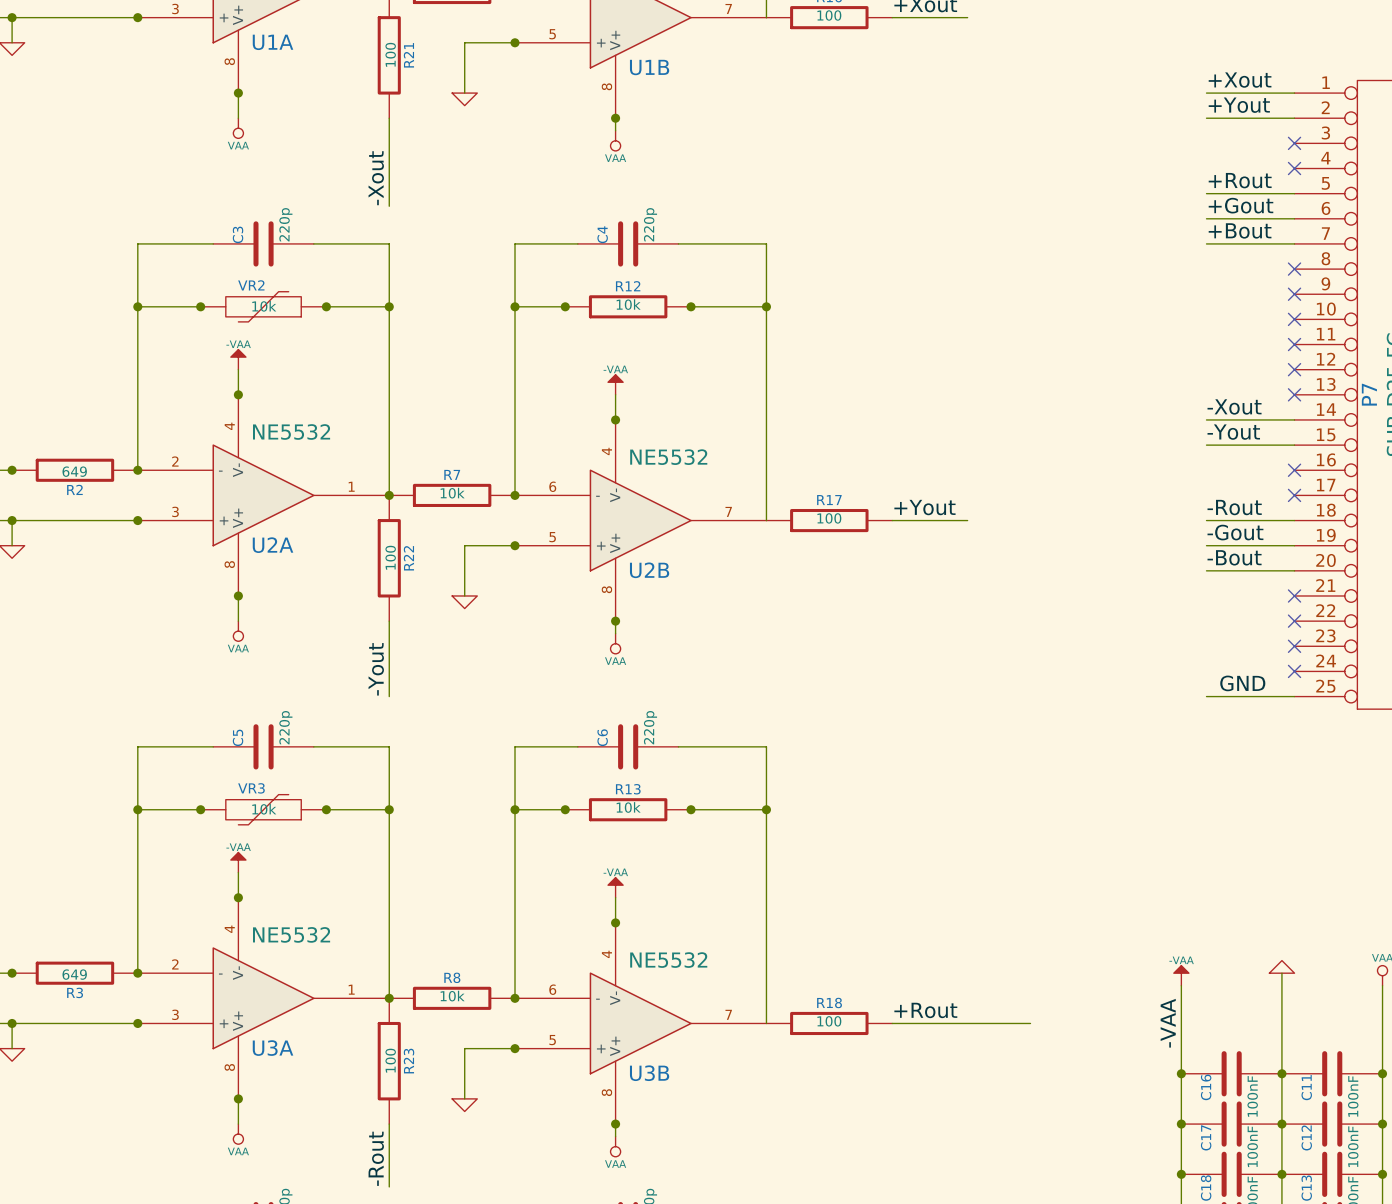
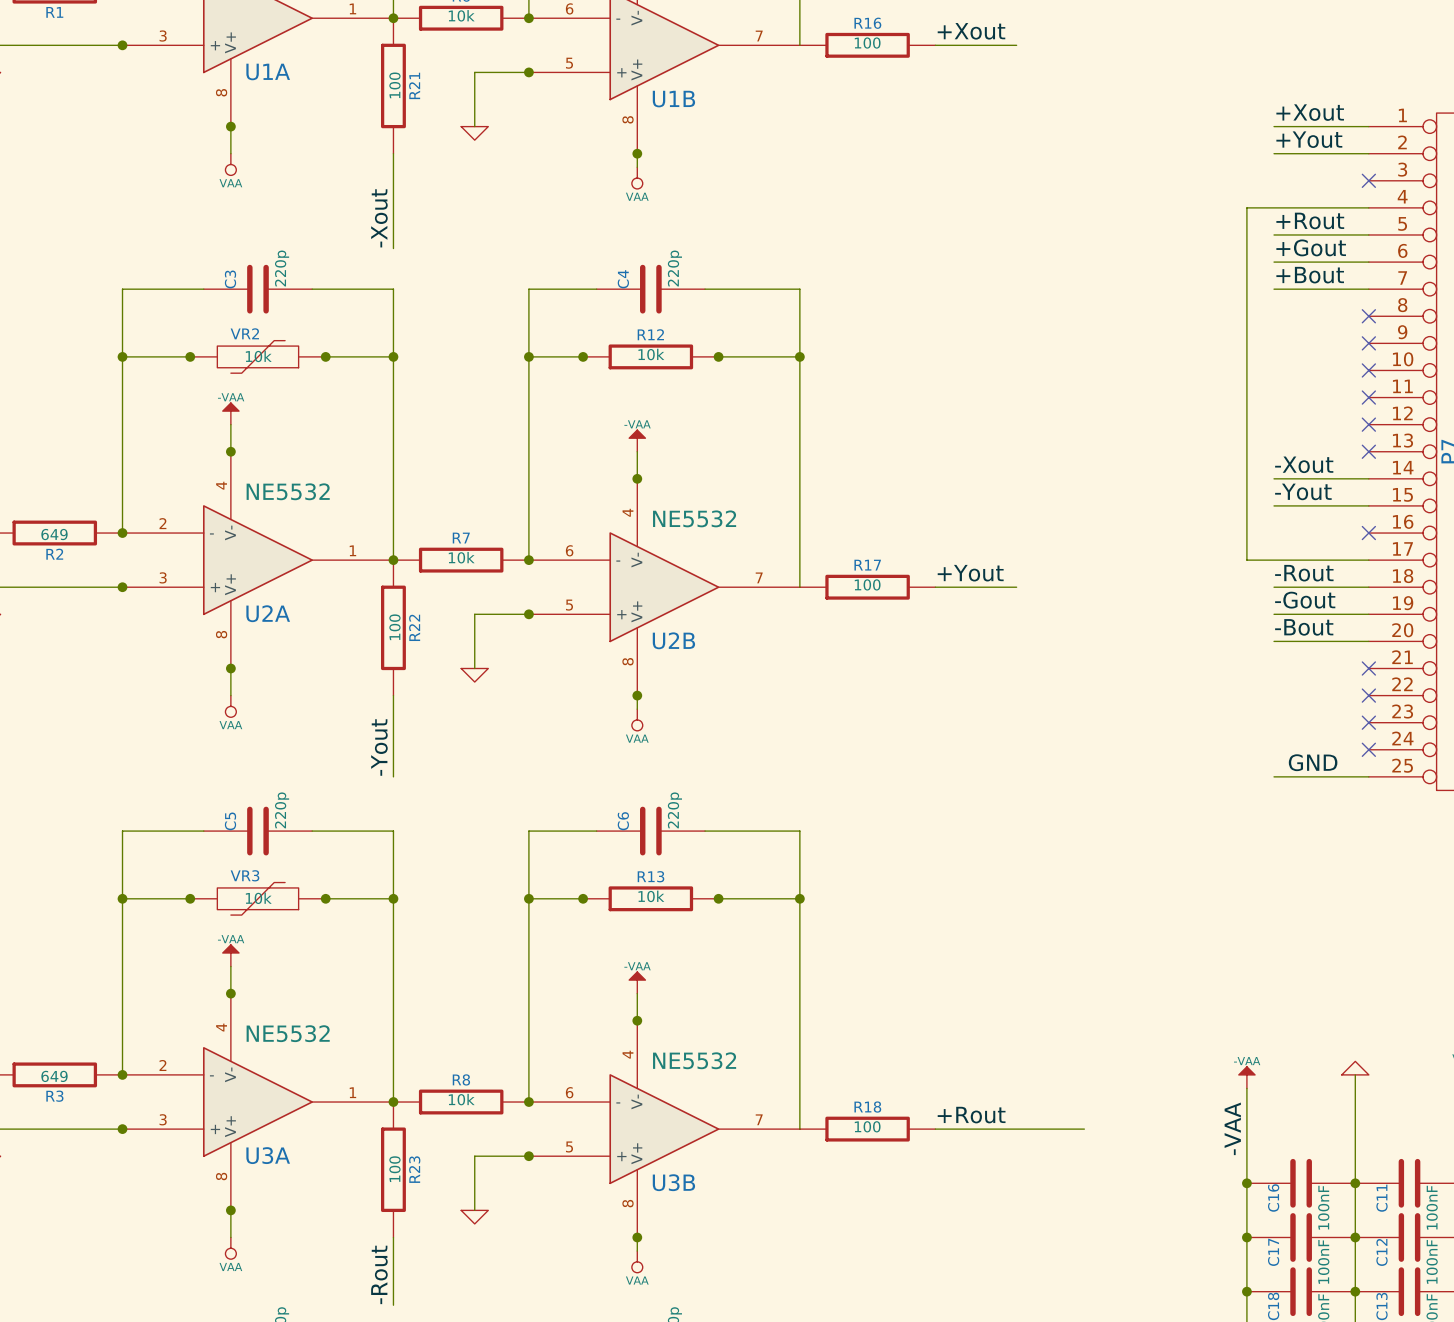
wire: none -> (1368, 207) (1246, 207) (1246, 560) (1368, 560)
no-connect mark: (1294, 168) -> none
no-connect mark: (1294, 495) -> none

